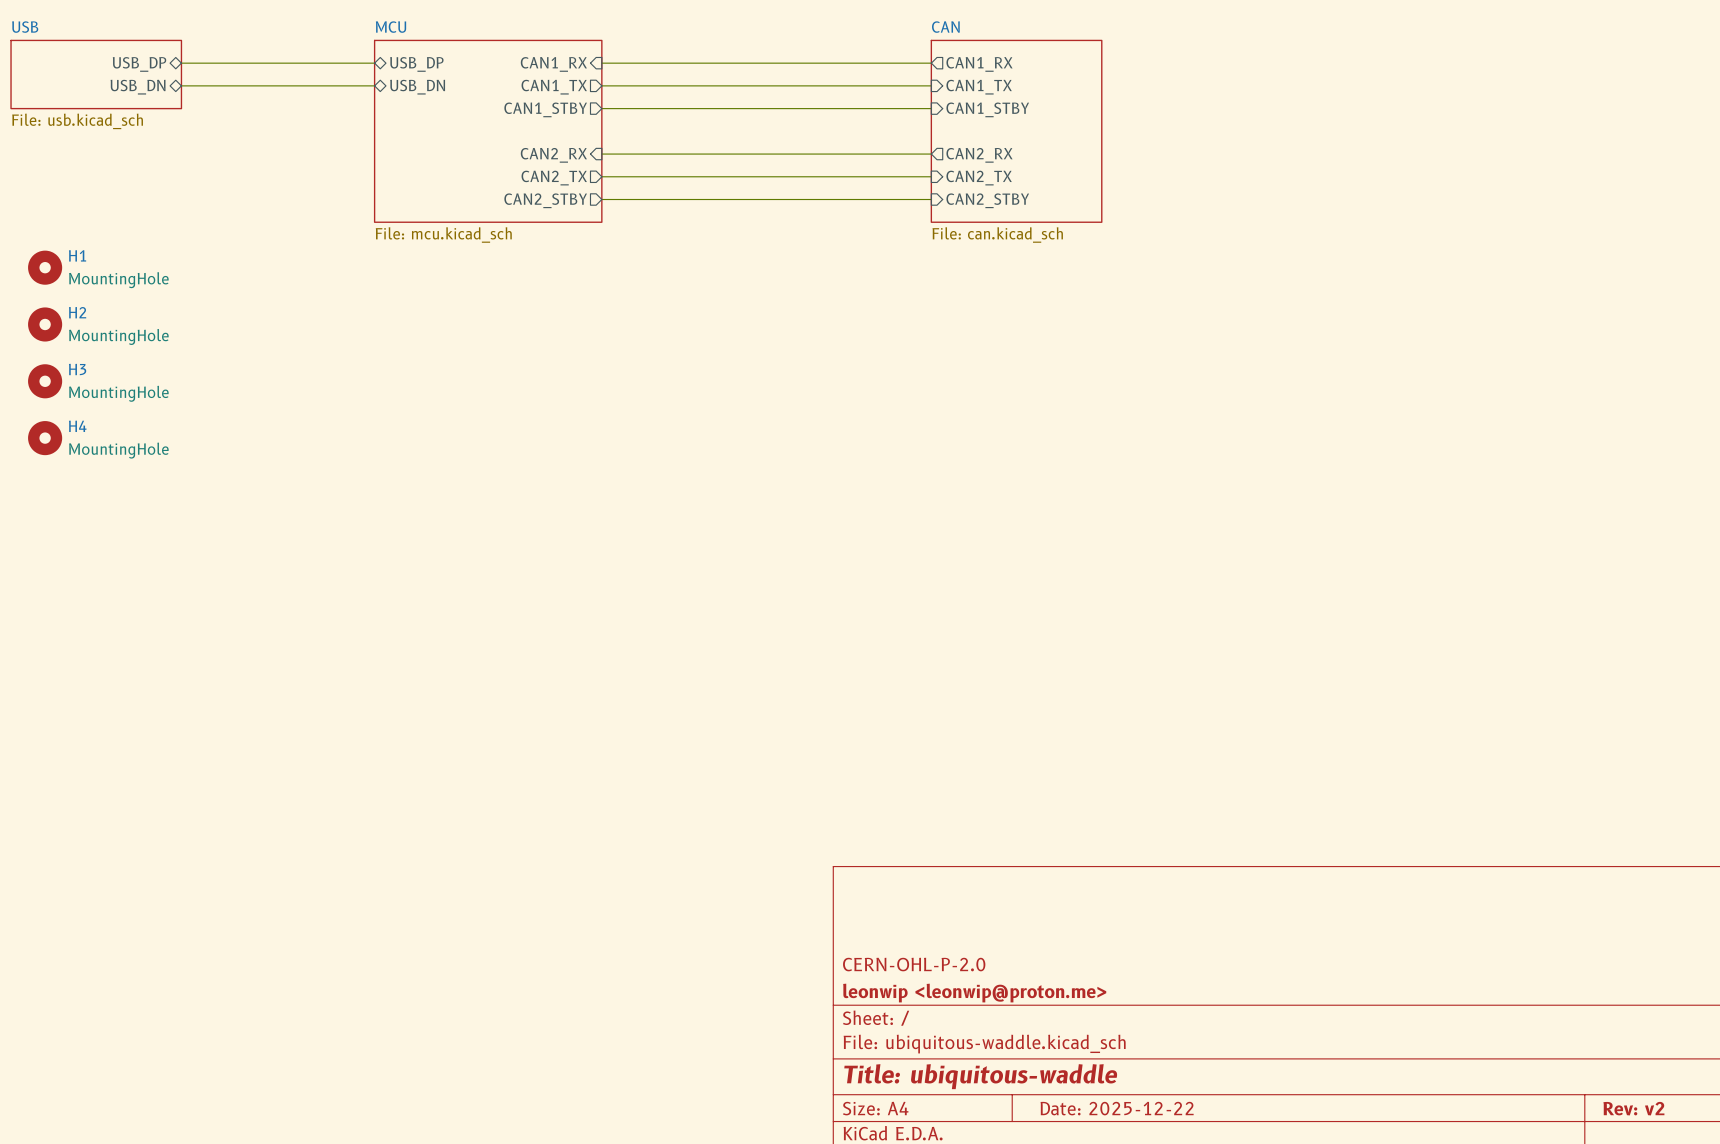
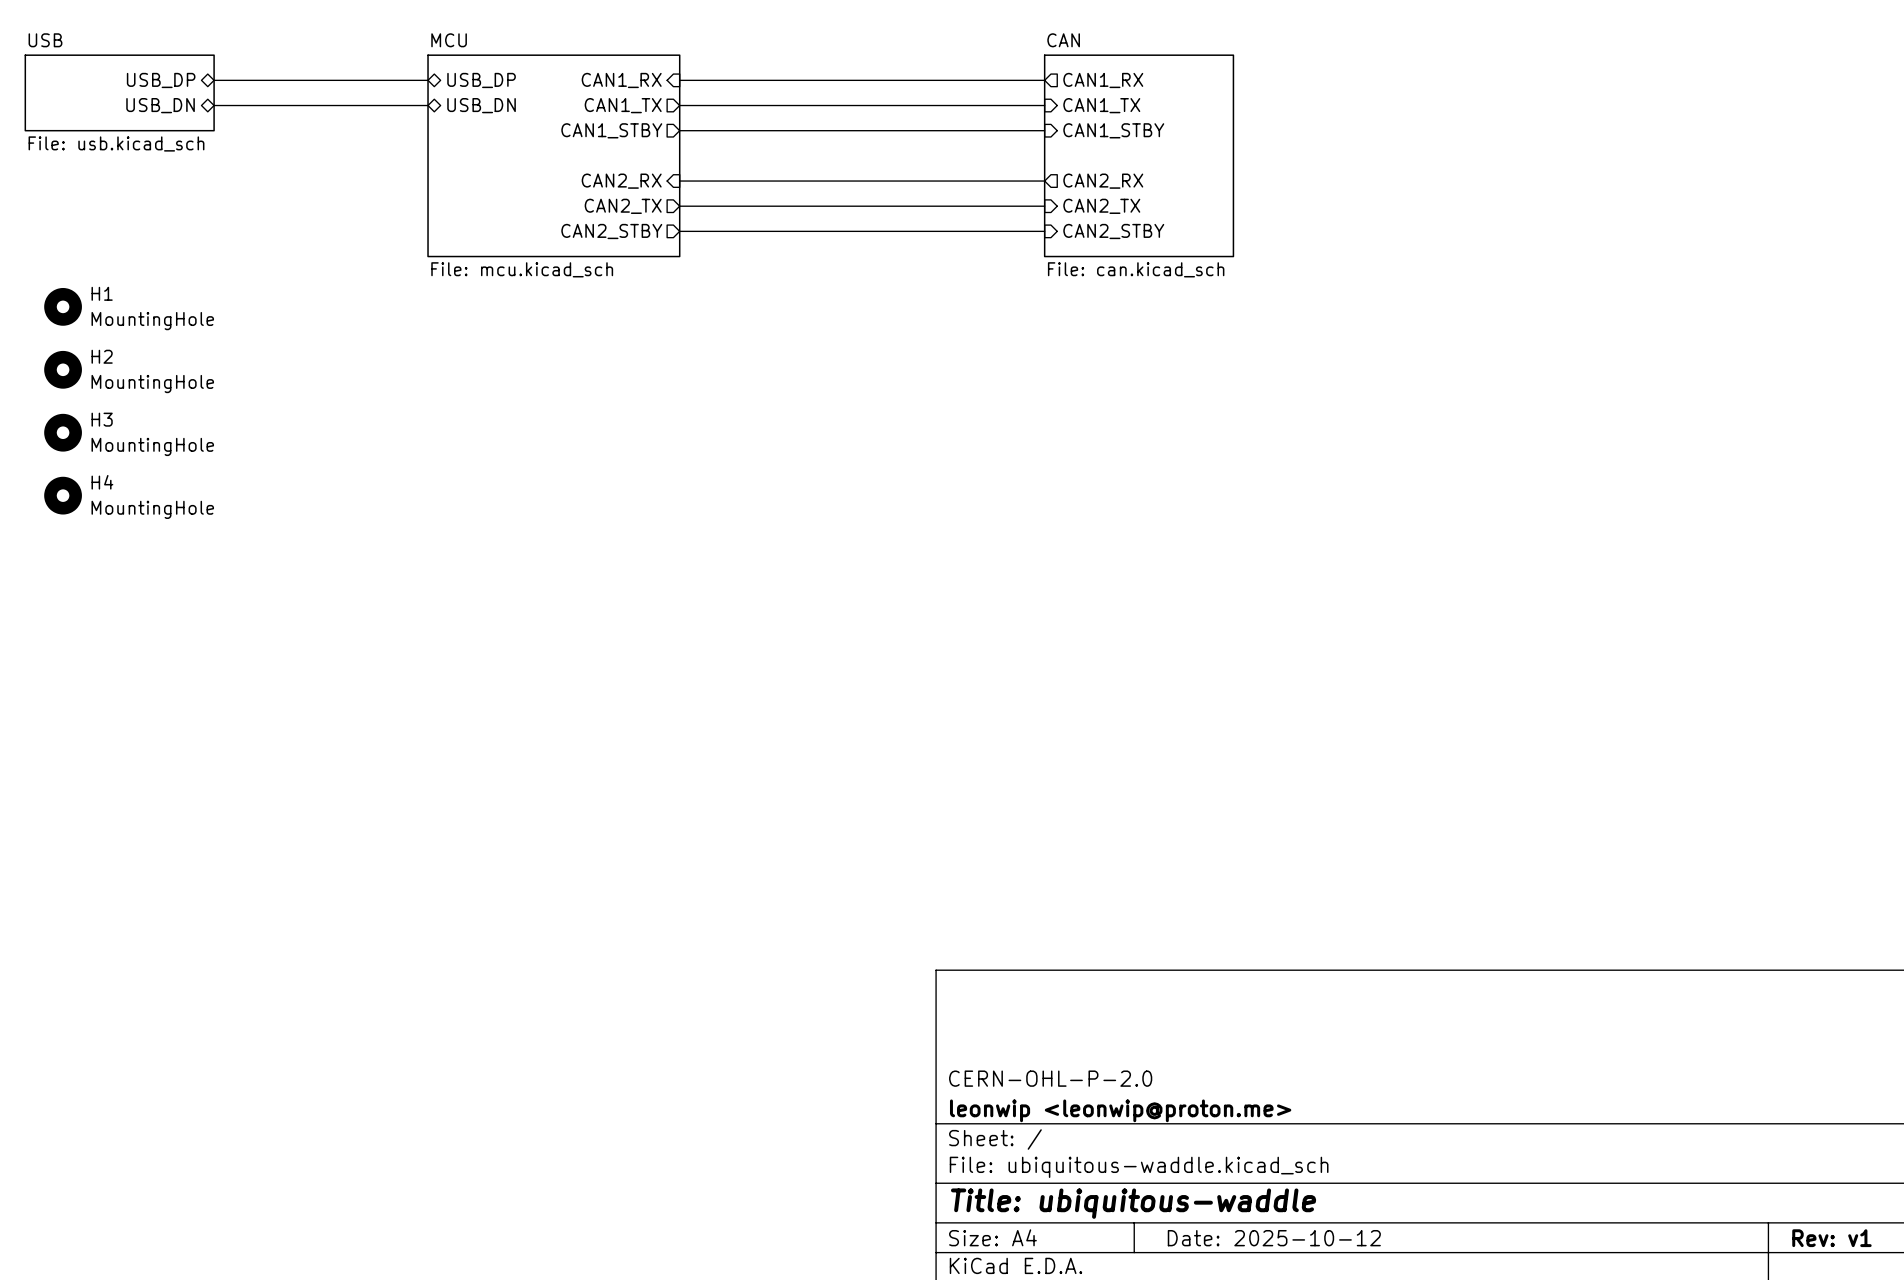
title block: Date: 2025-12-22 (1117, 1108) -> Date: 2025-10-12 (1274, 1238)
title block: Rev: v2 (1633, 1108) -> Rev: v1 (1831, 1238)

